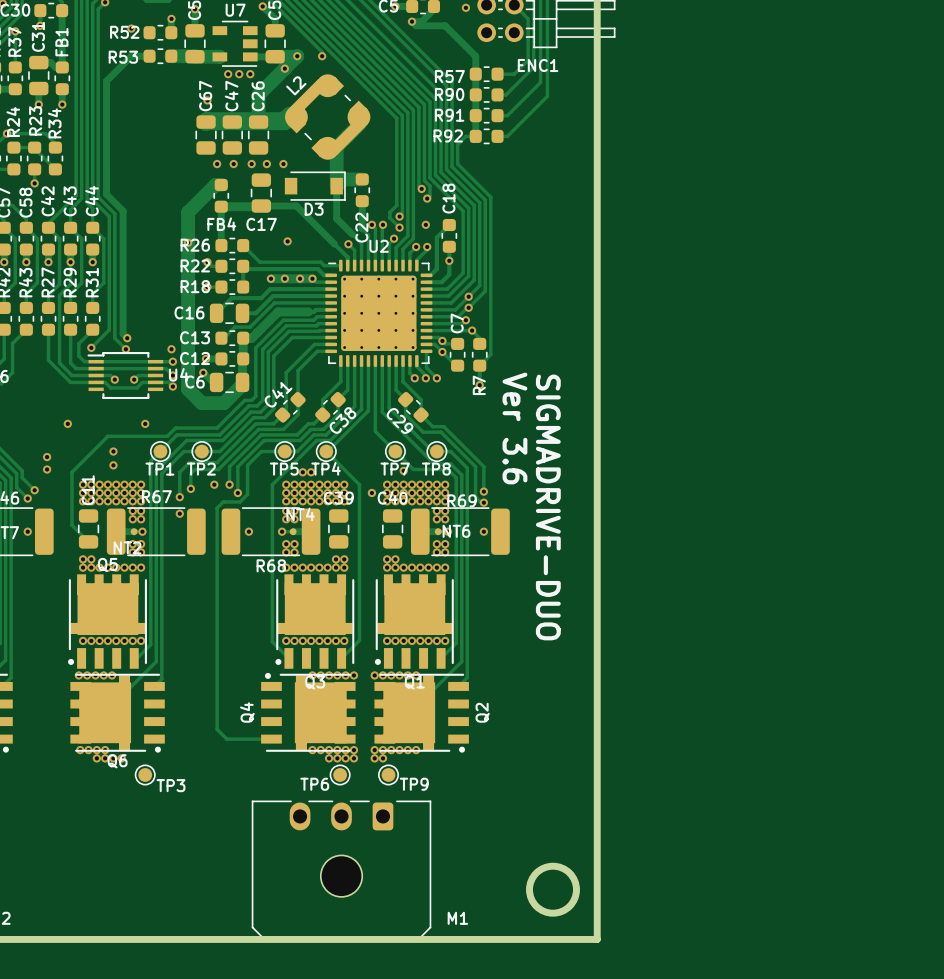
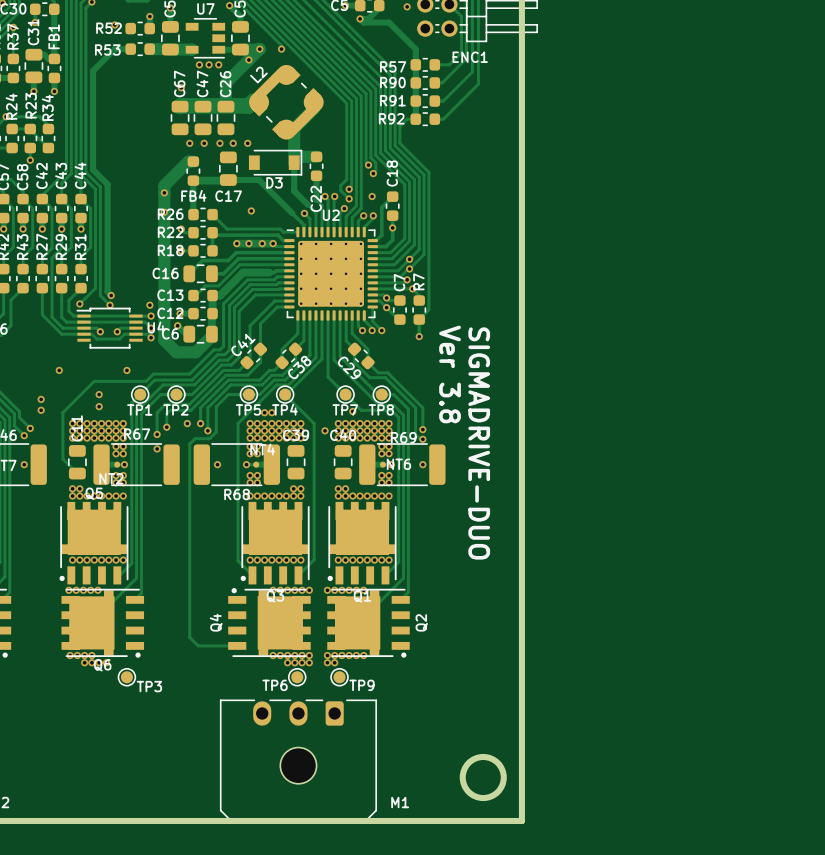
via: none -> (164, 192)
R7 name position: R7 (479, 385) -> R7 (418, 281)
text: Ver 3.6 (514, 428) -> Ver 3.8 (450, 374)

